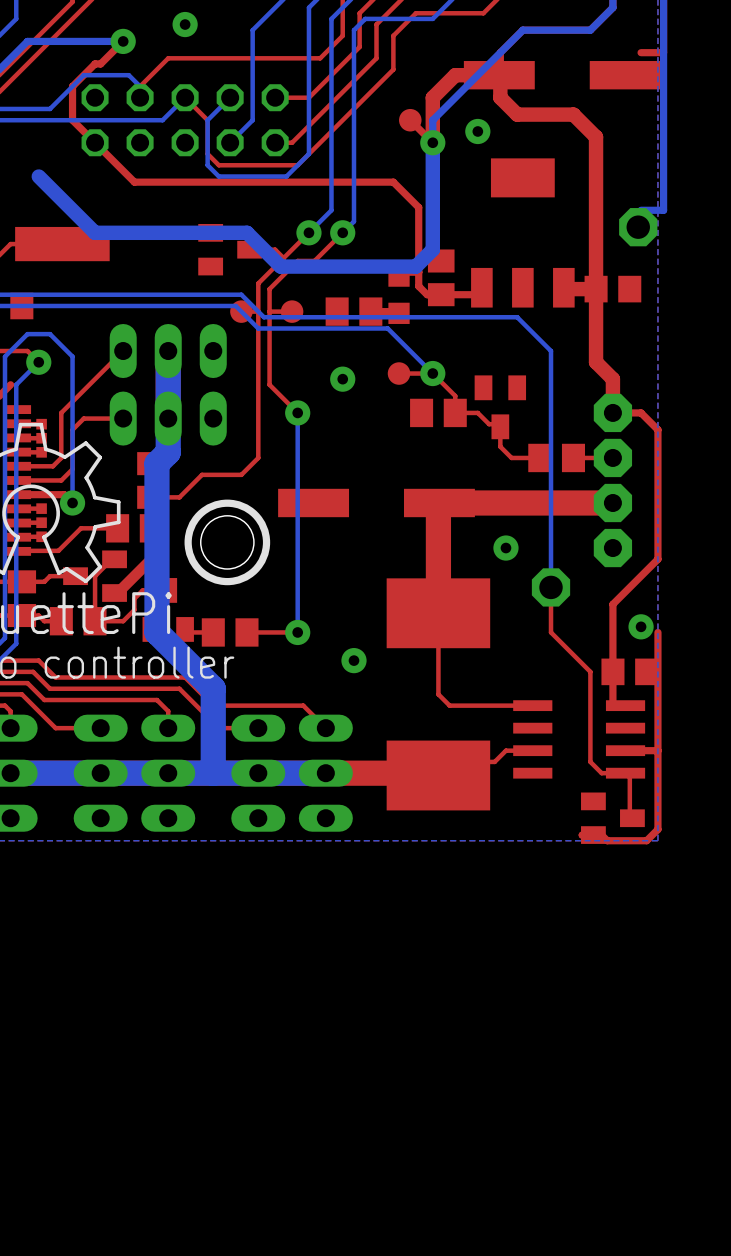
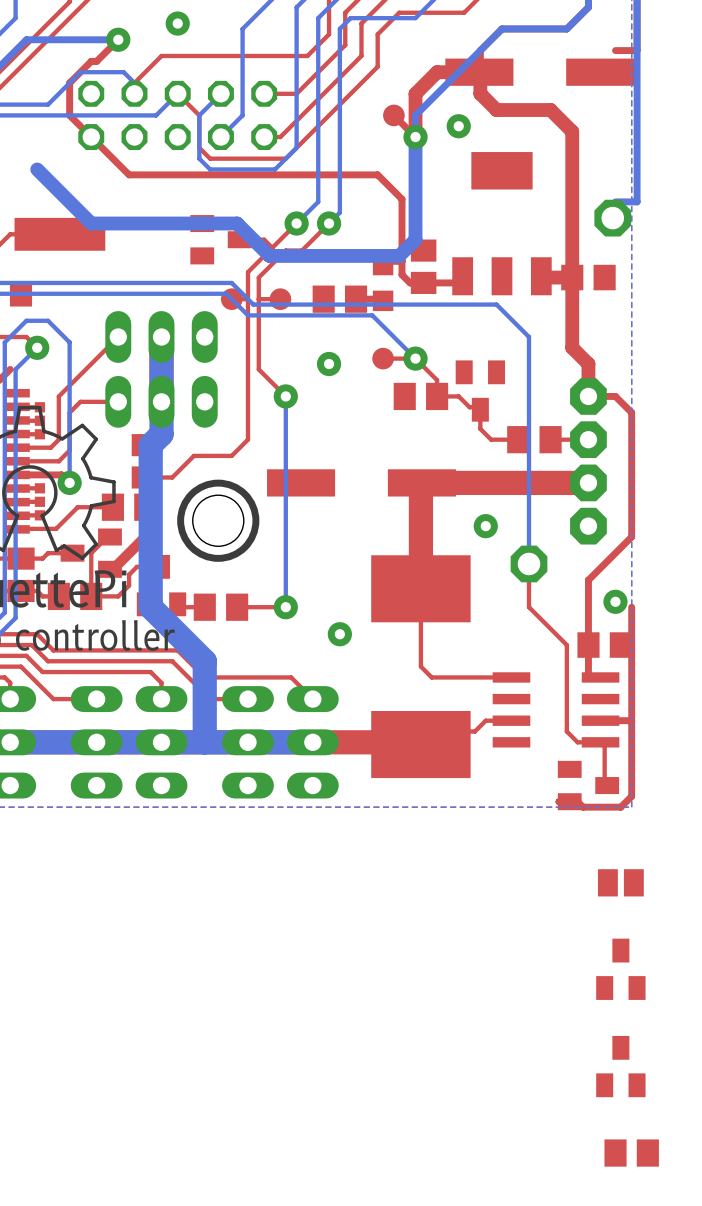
part: none -> (620, 882)
part: none -> (620, 969)
part: none -> (620, 1066)
part: none -> (631, 1153)

